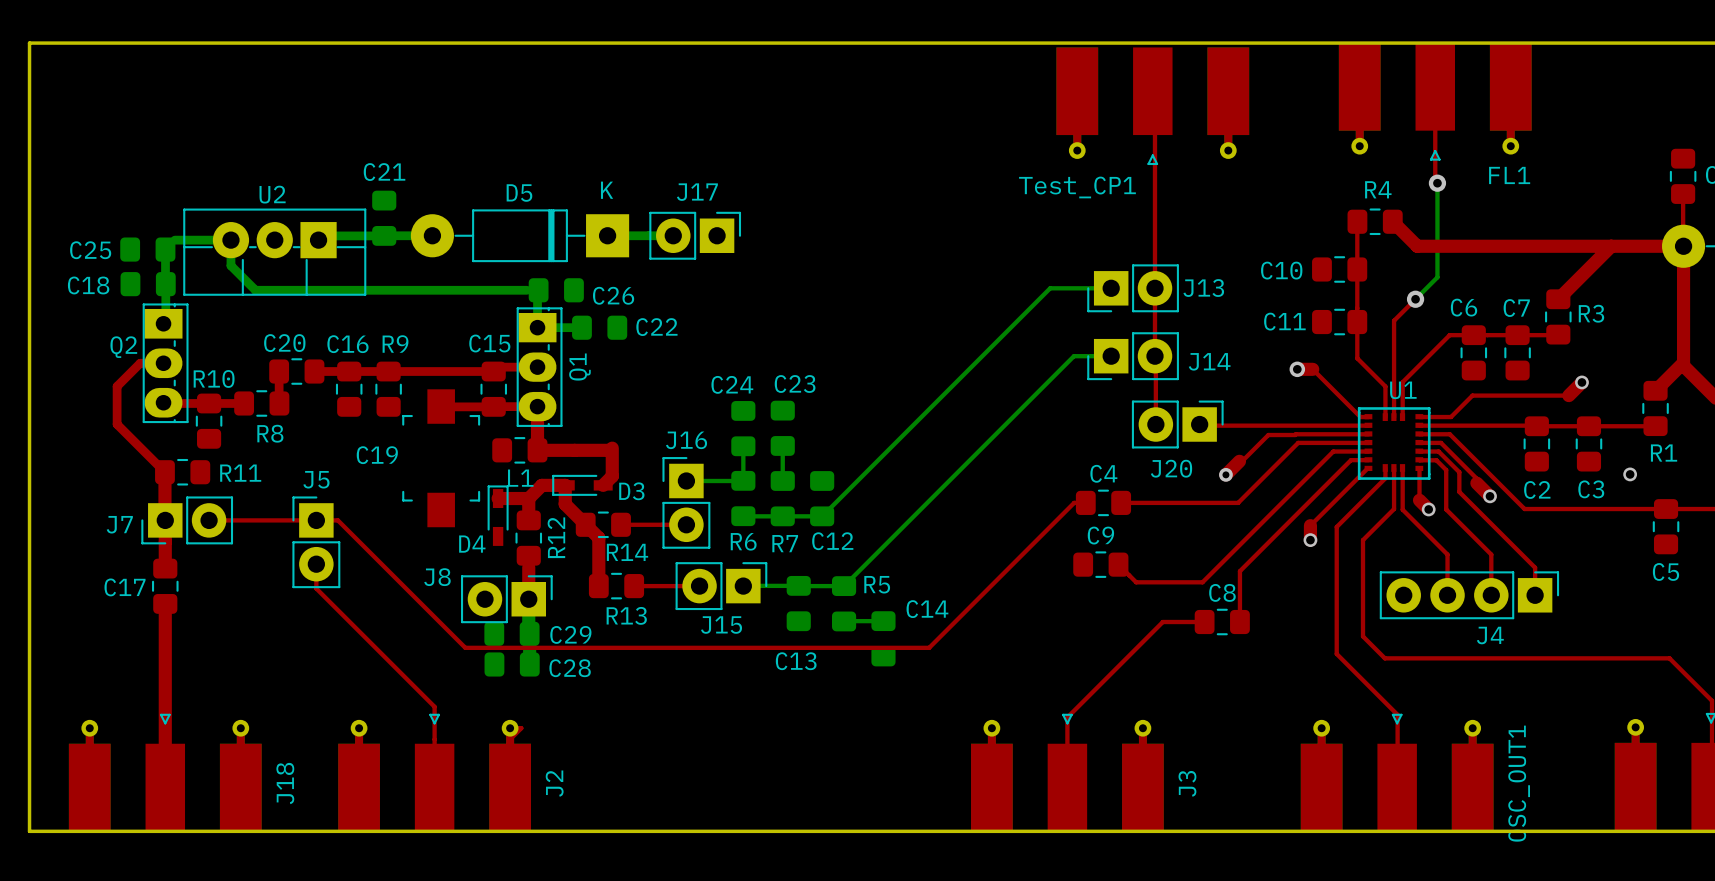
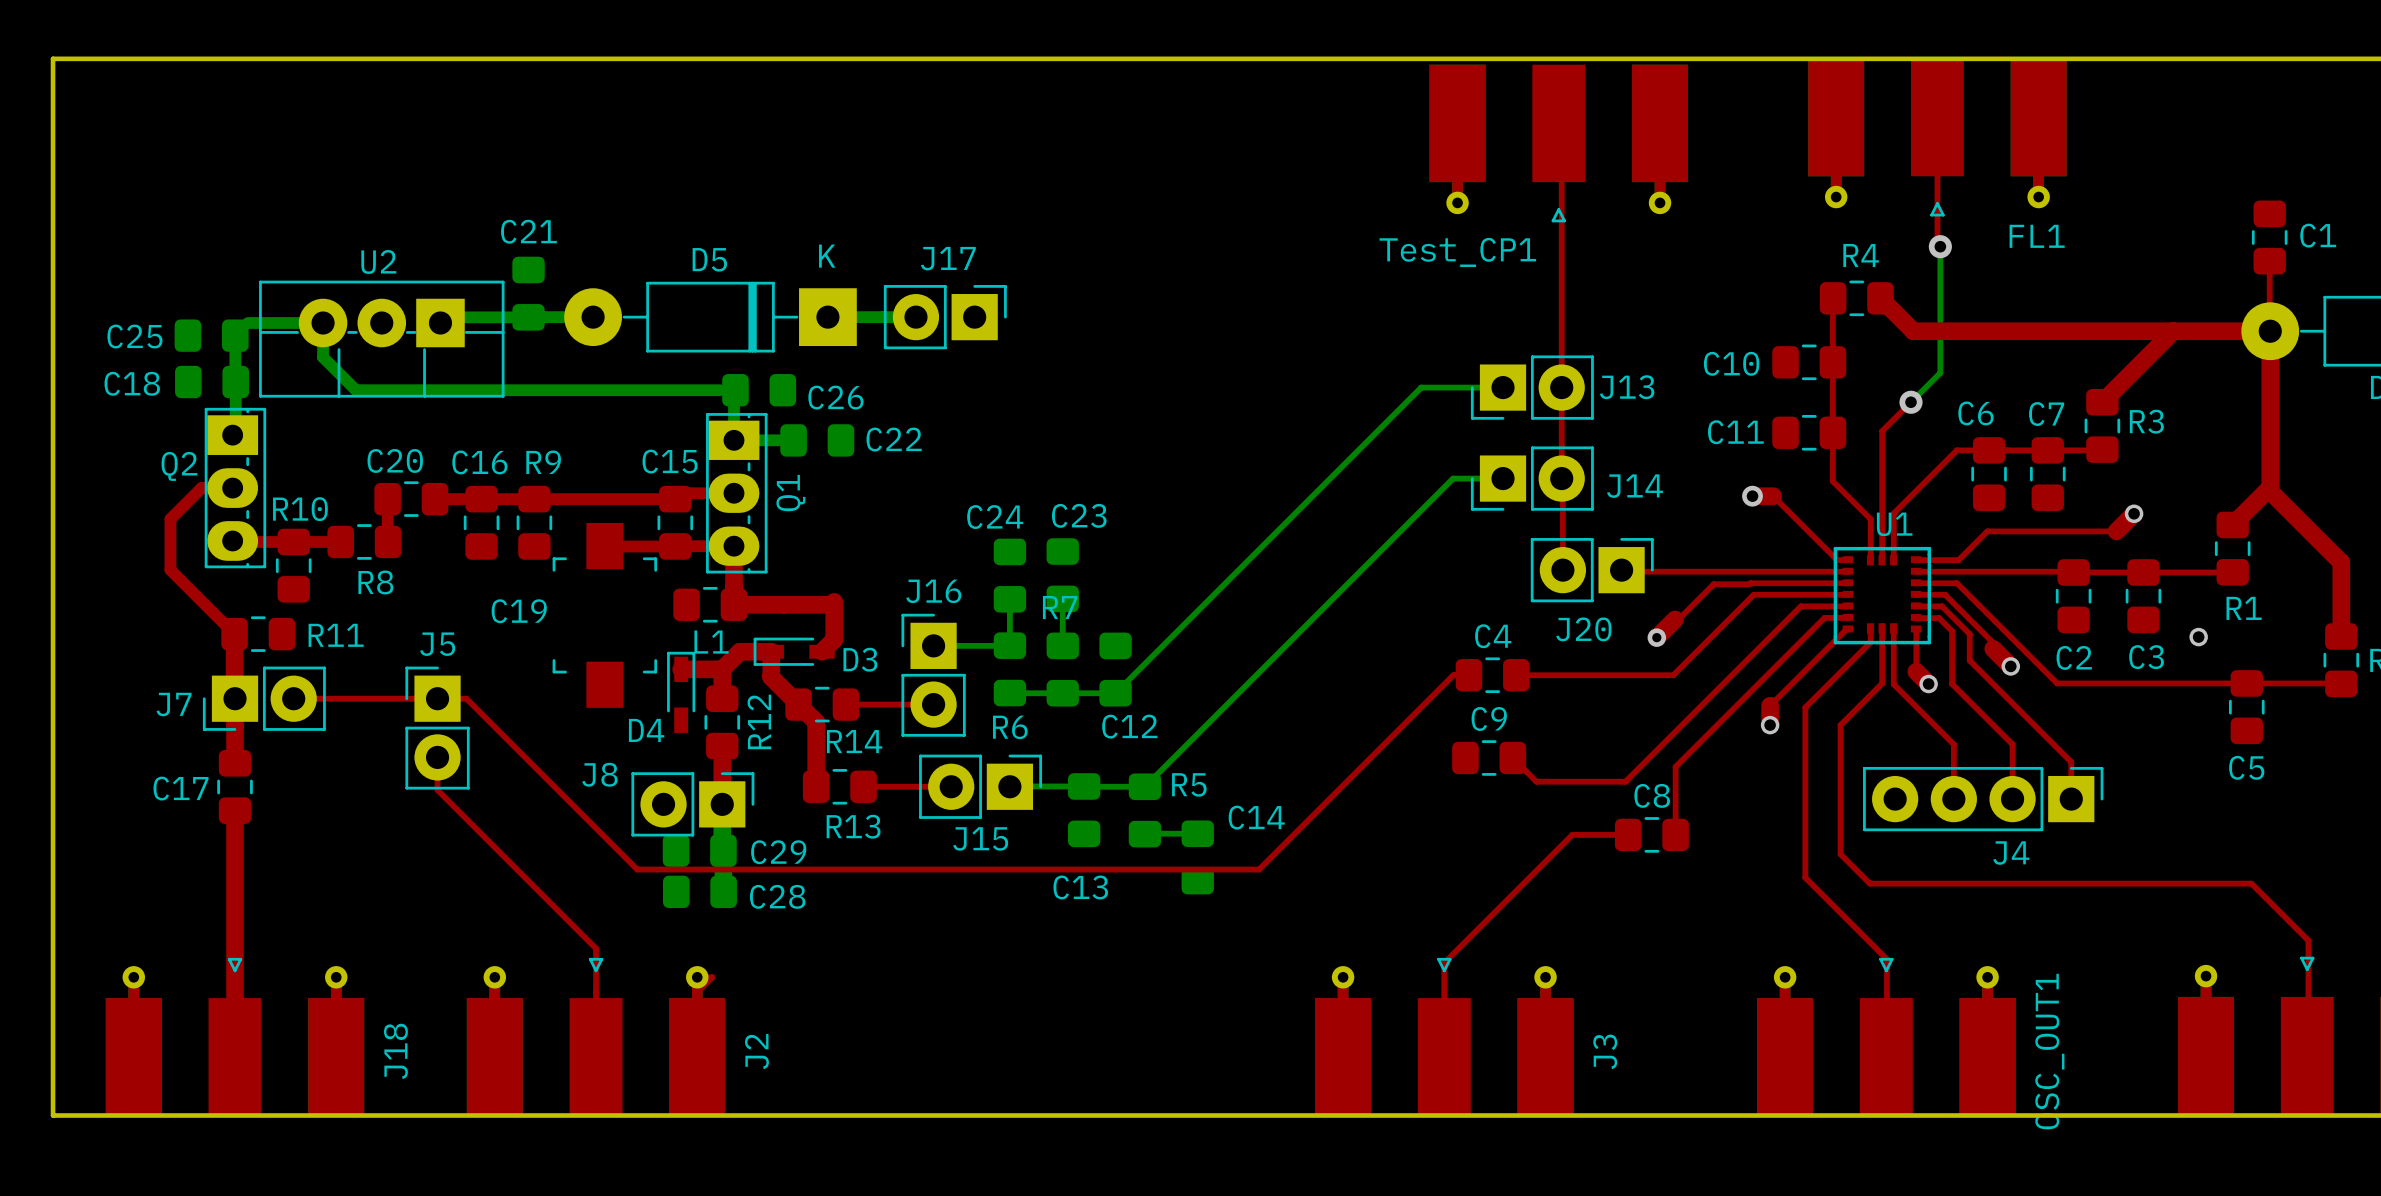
R7 name position: R7 (785, 543) -> R7 (1060, 607)

